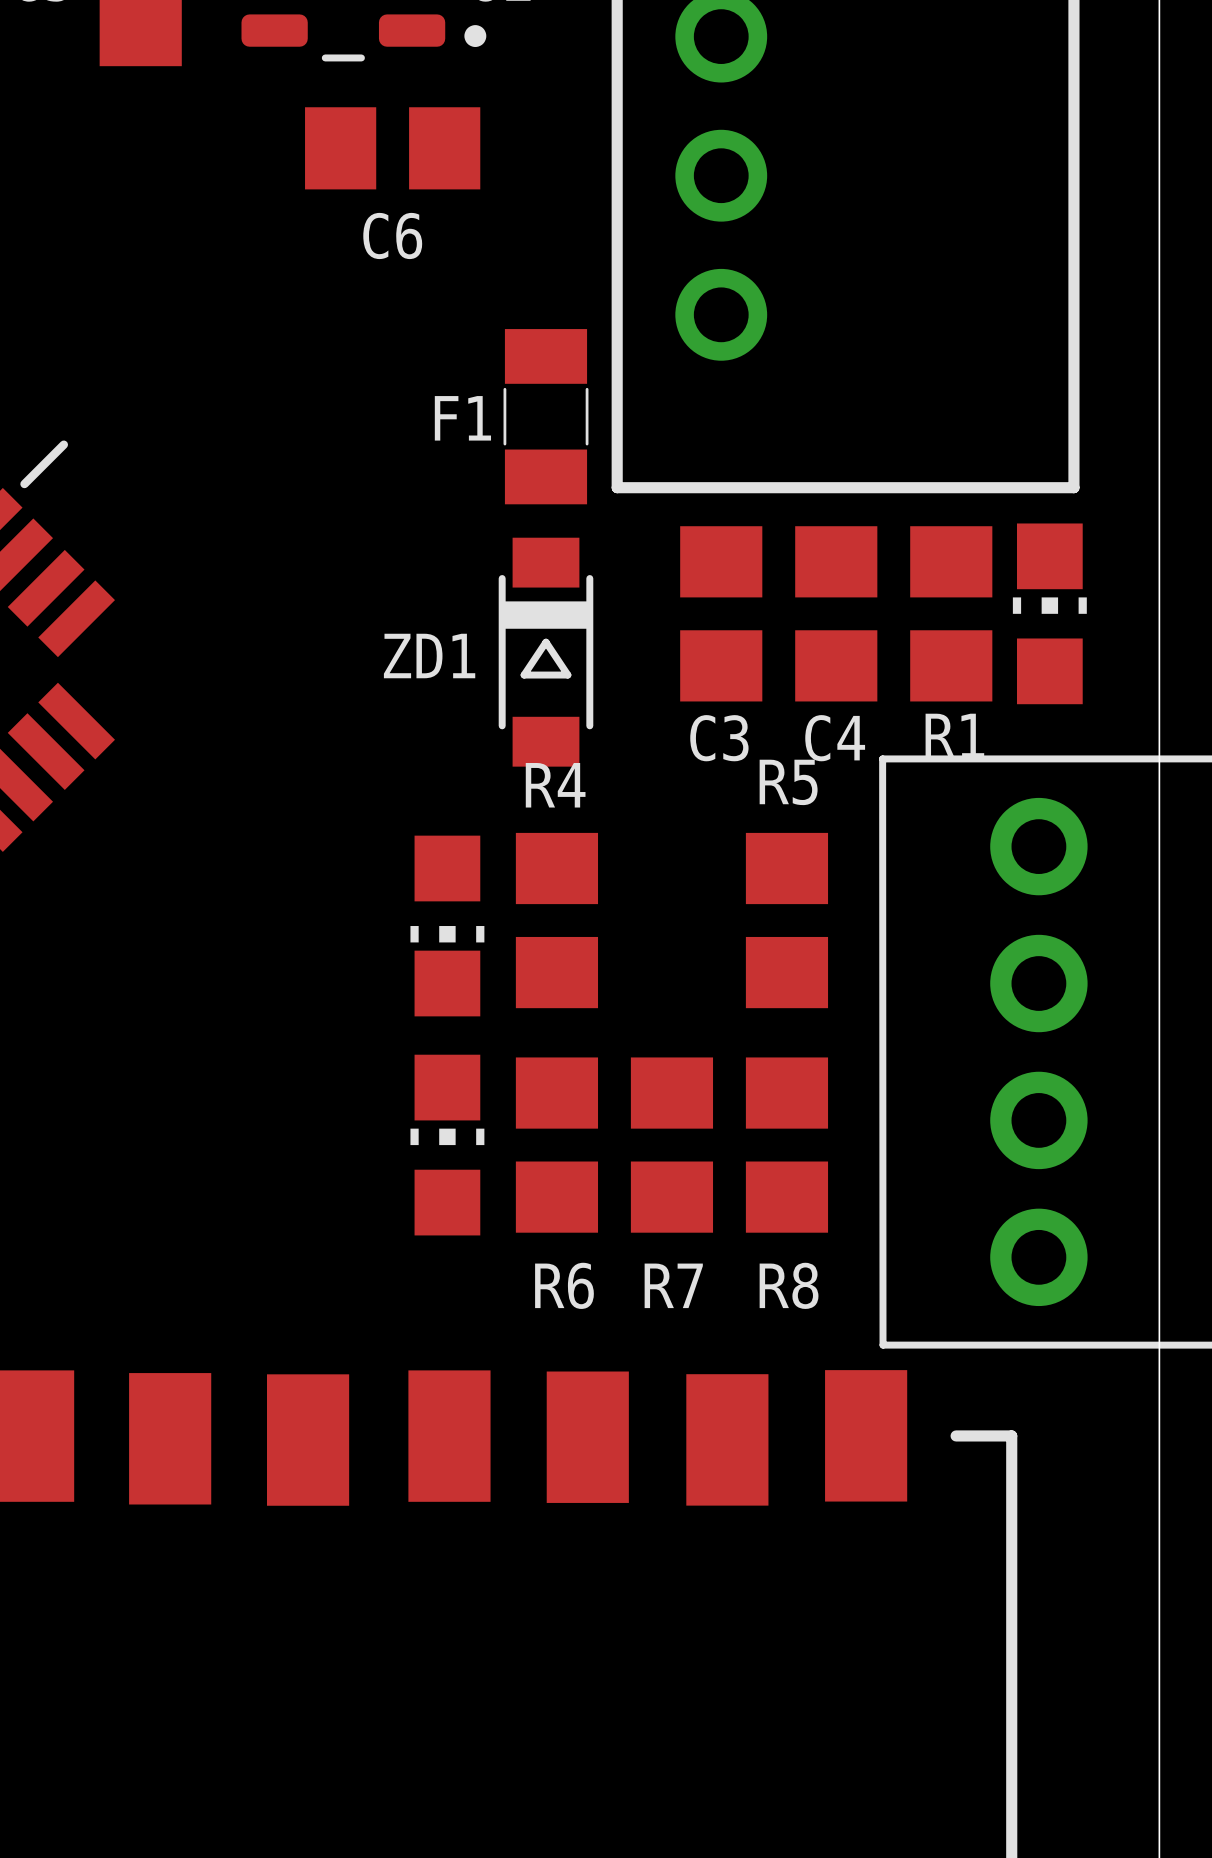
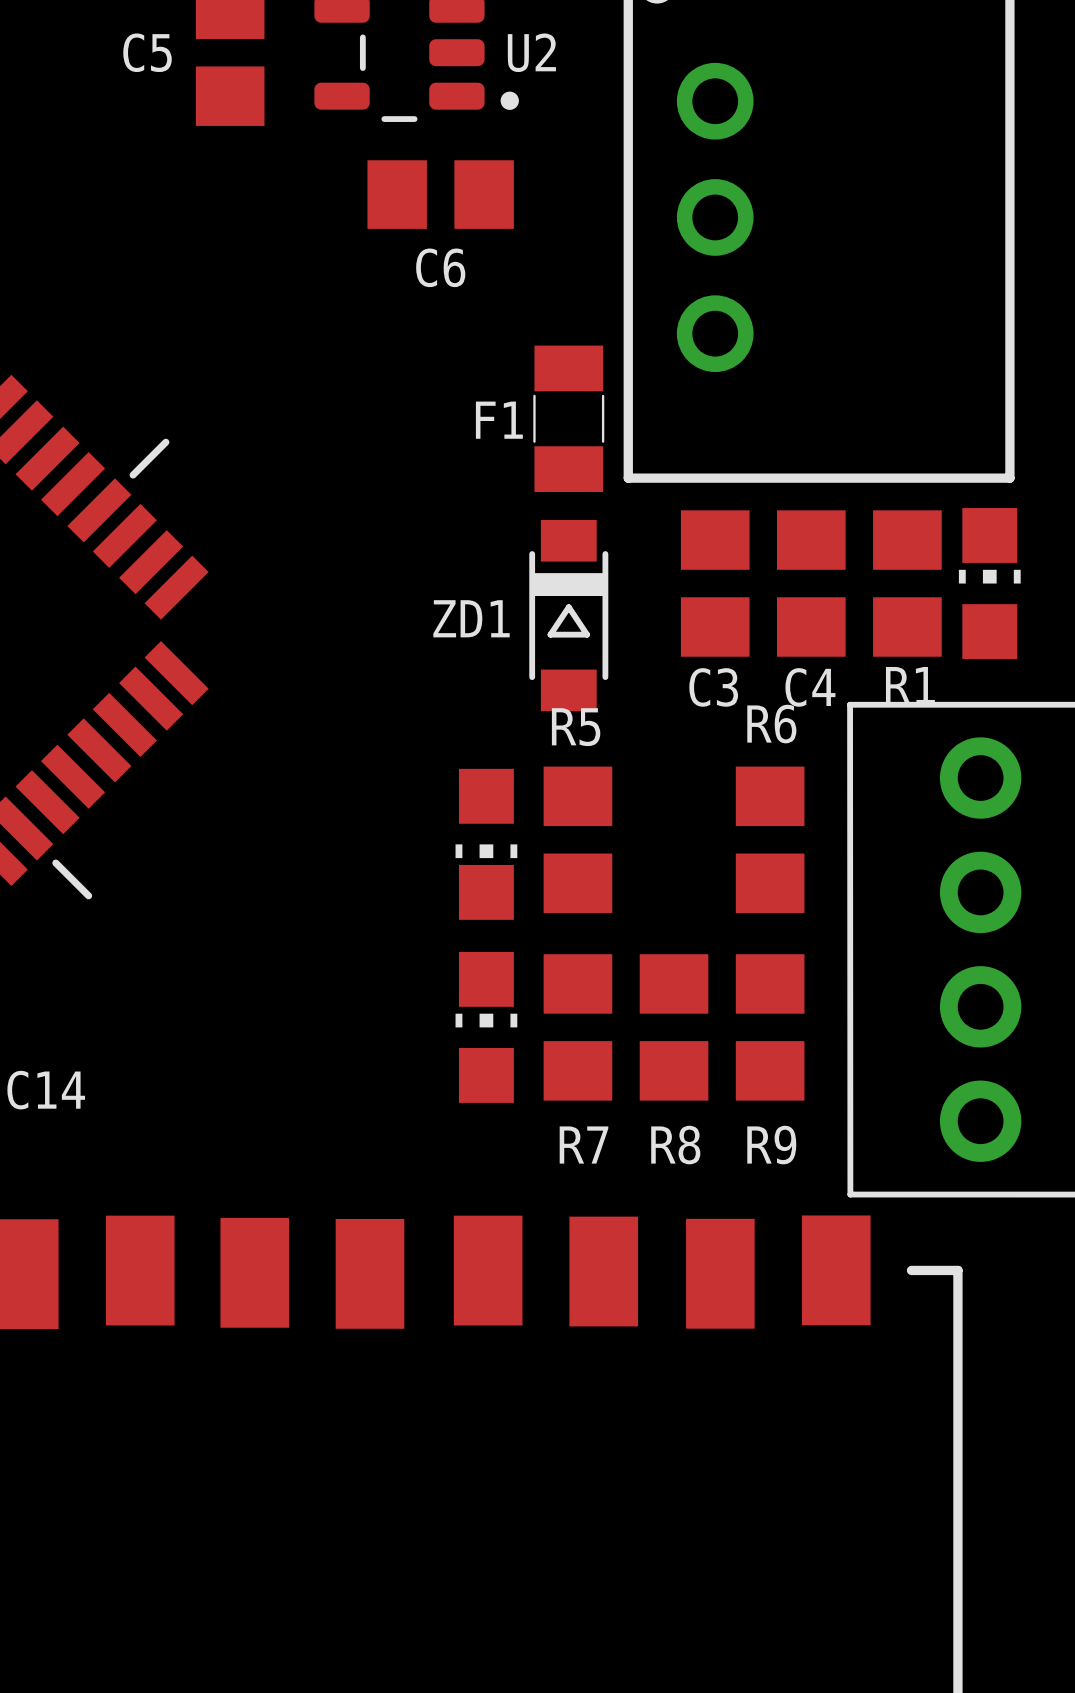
R5 name: R5 (788, 782) -> R6 (771, 724)
R4 name: R4 (555, 785) -> R5 (576, 727)
R6 name: R6 (564, 1285) -> R7 (584, 1145)
R7 name: R7 (673, 1285) -> R8 (675, 1145)
R8 name: R8 (789, 1285) -> R9 (771, 1145)

